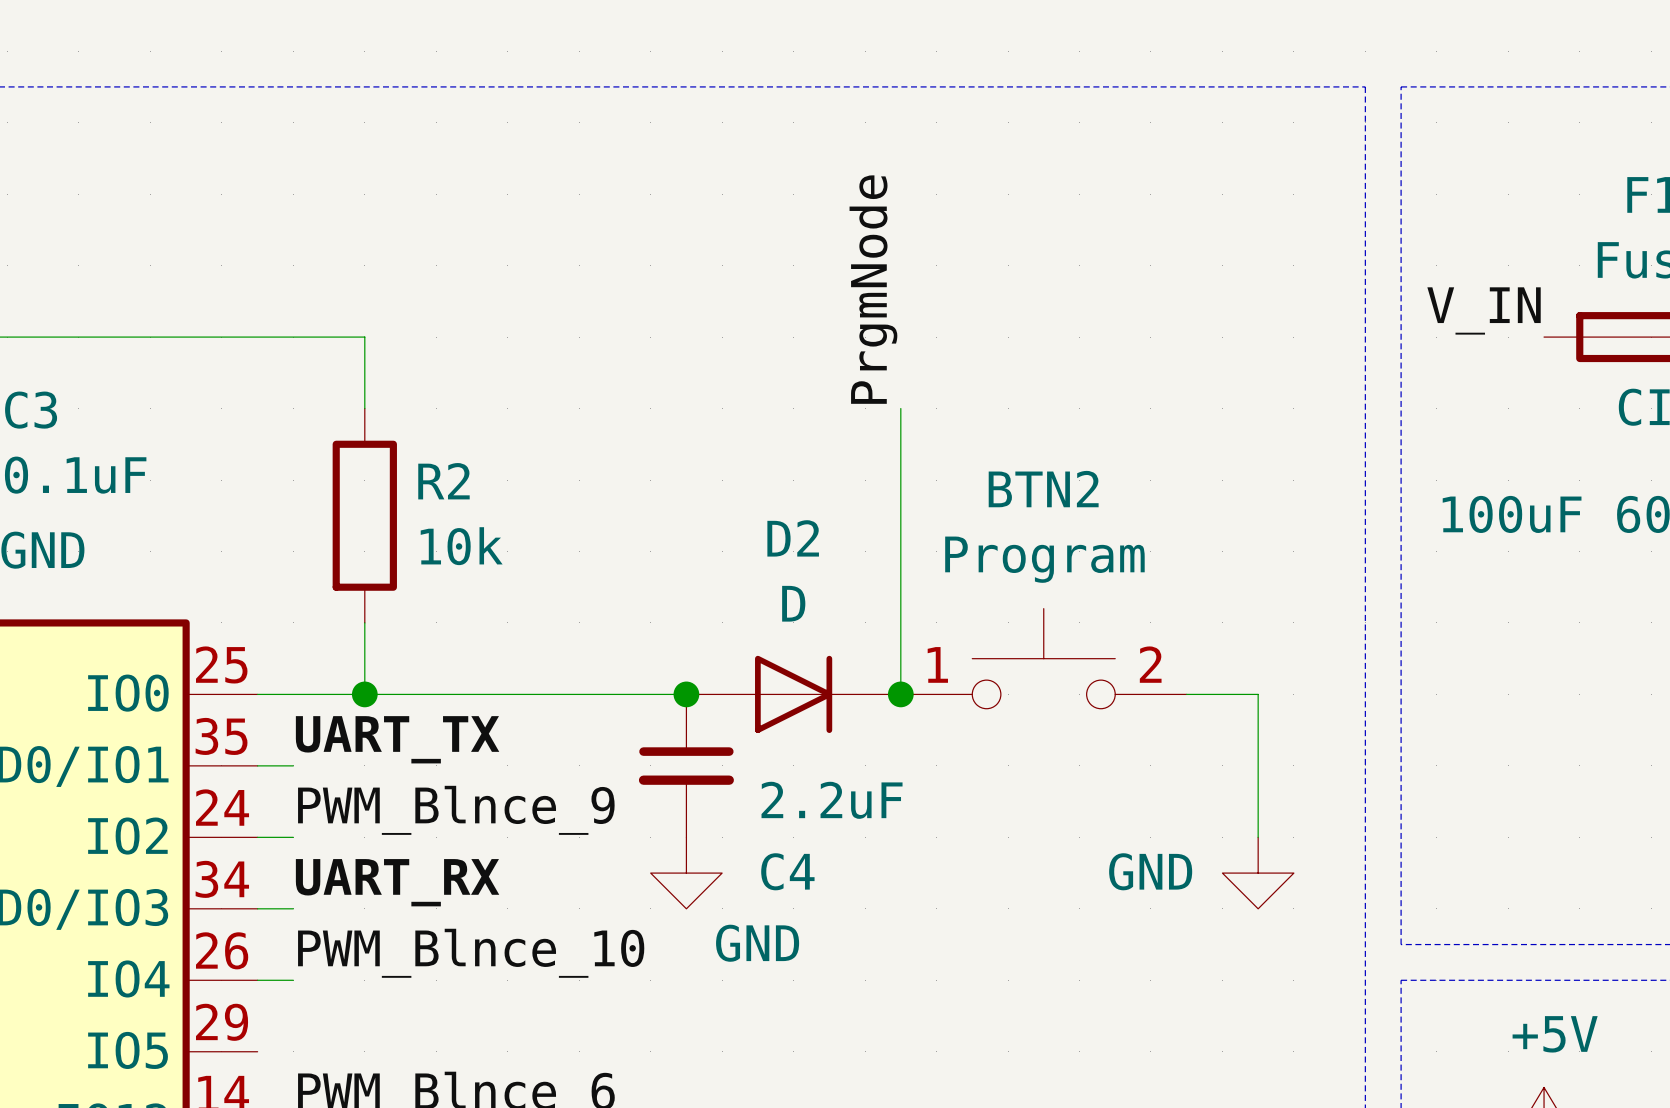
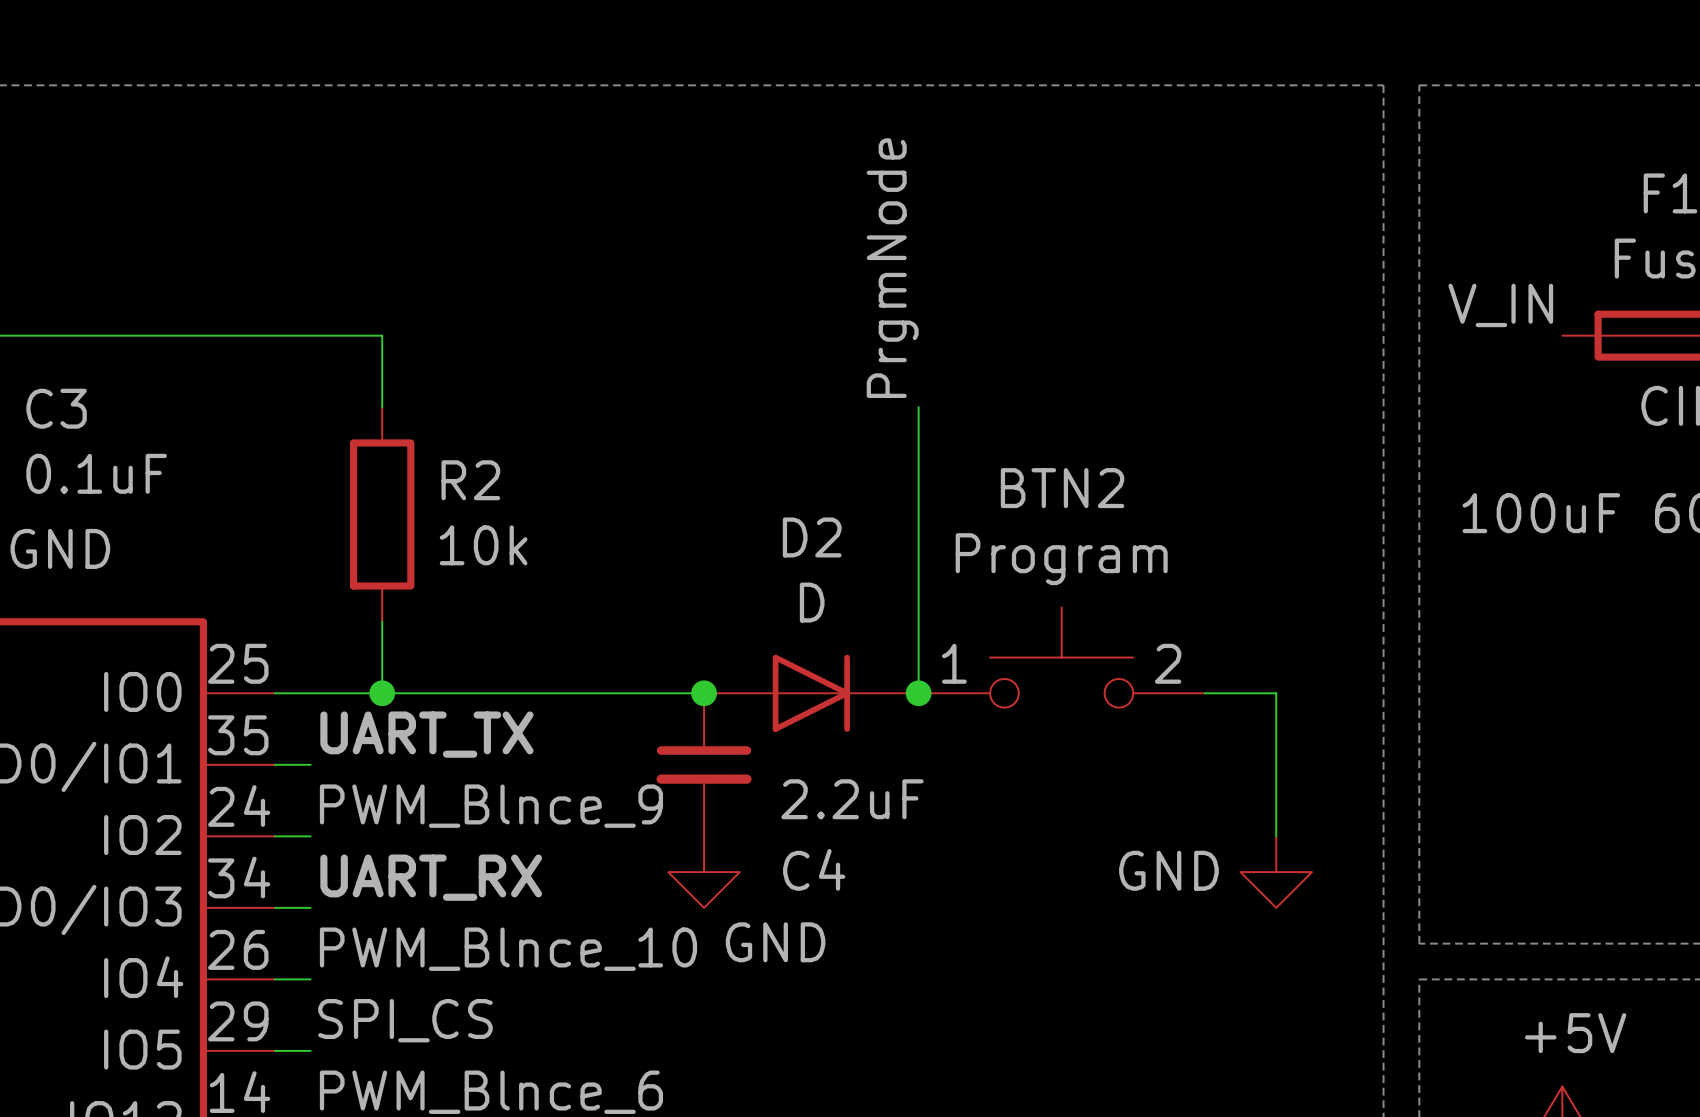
label: none -> SPI_CS (405, 1020)
wire: none -> (274, 1050) (310, 1050)

